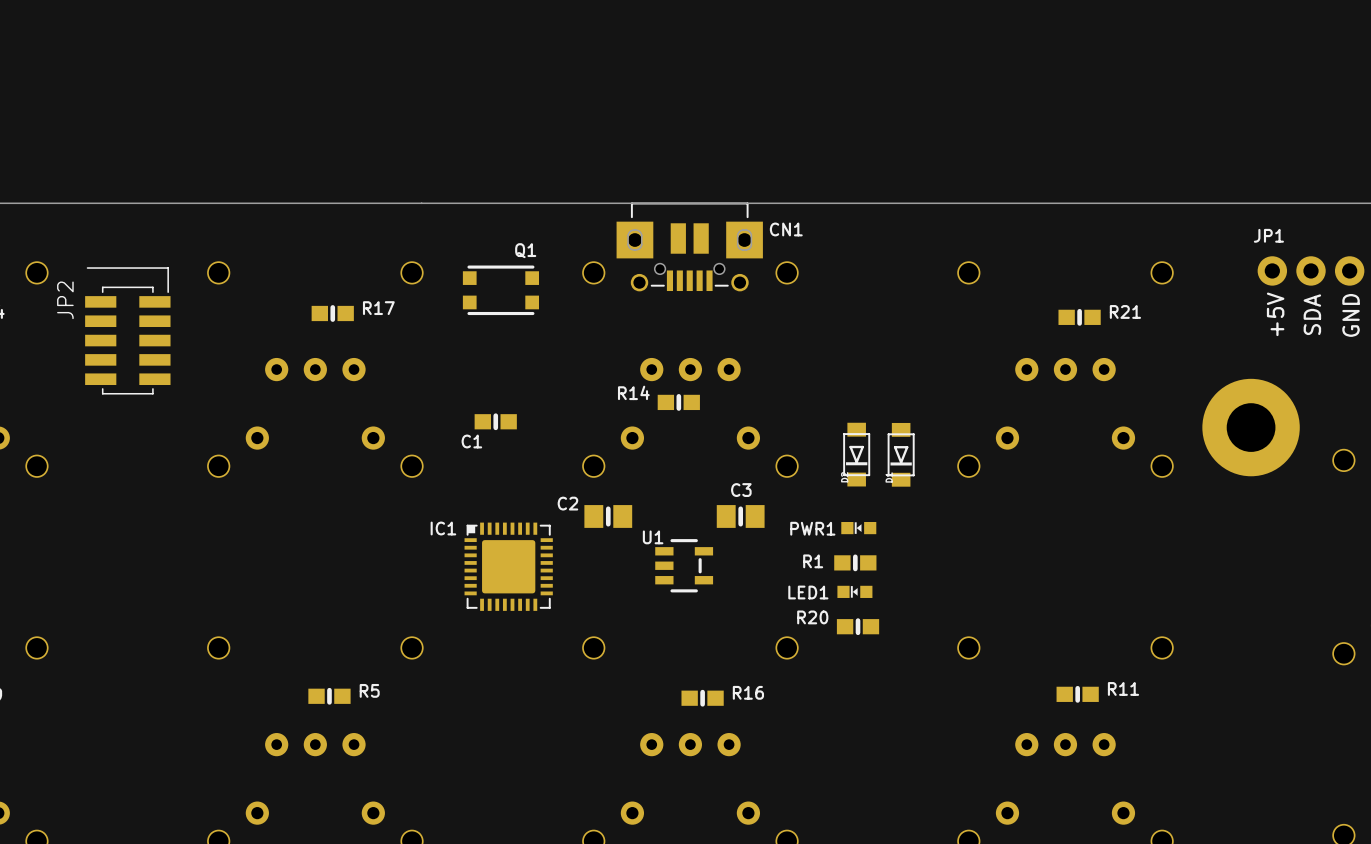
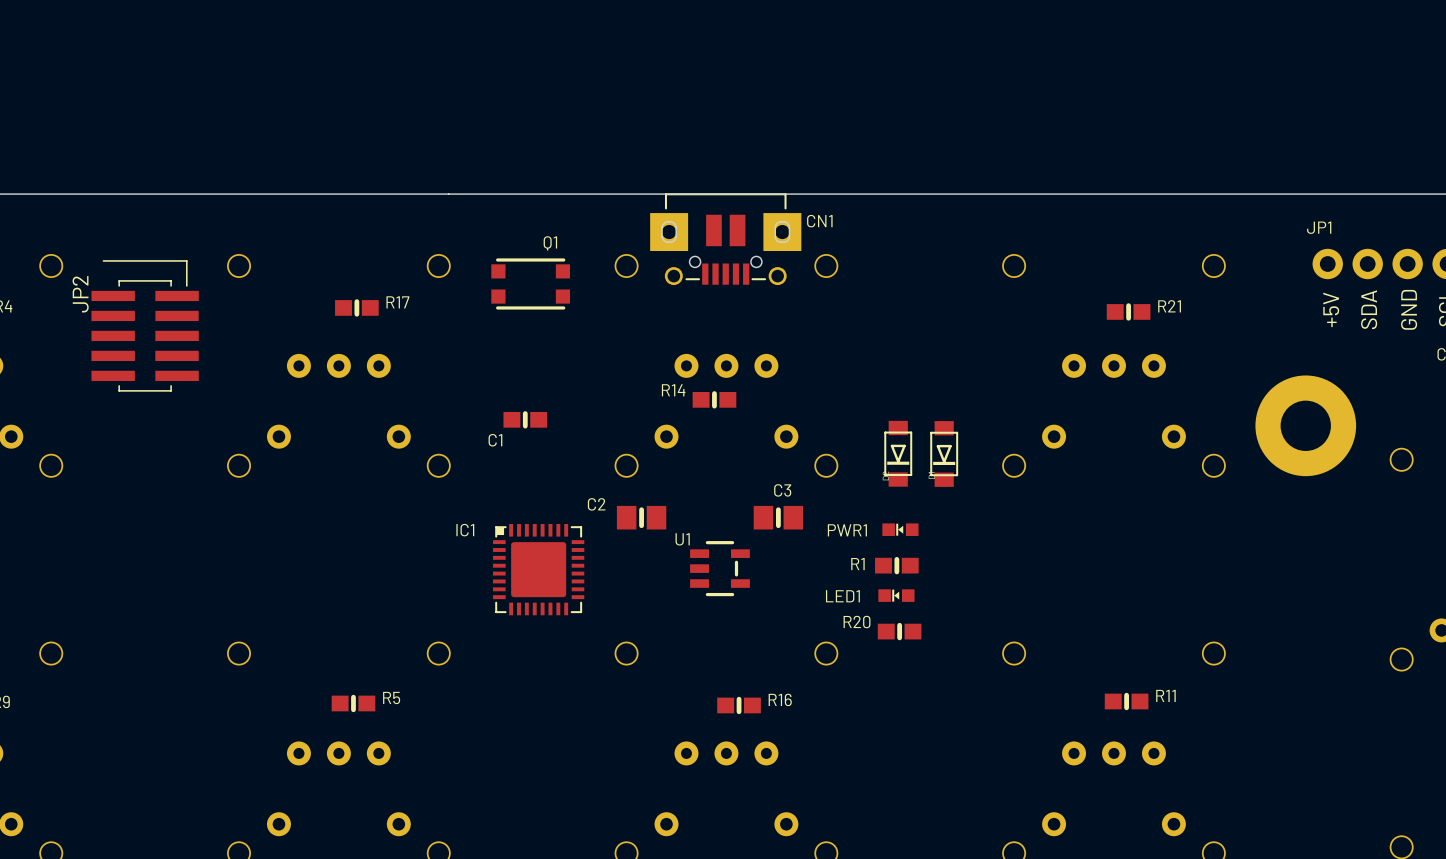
JP2 footprint: [85, 267, 171, 395] -> [91, 260, 199, 392]

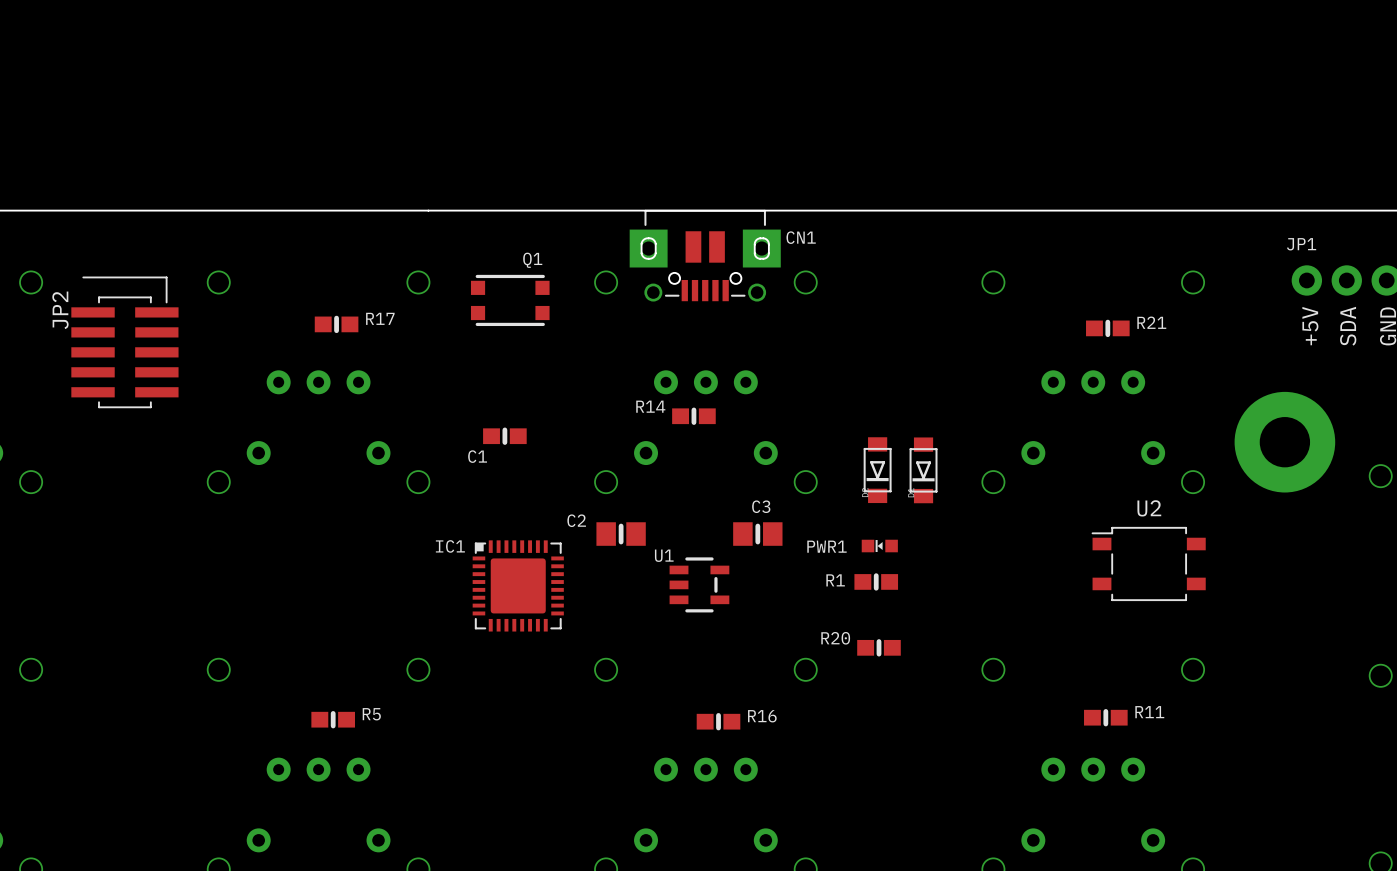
U2: none -> (1148, 563)
LED1: (896, 595) -> none

